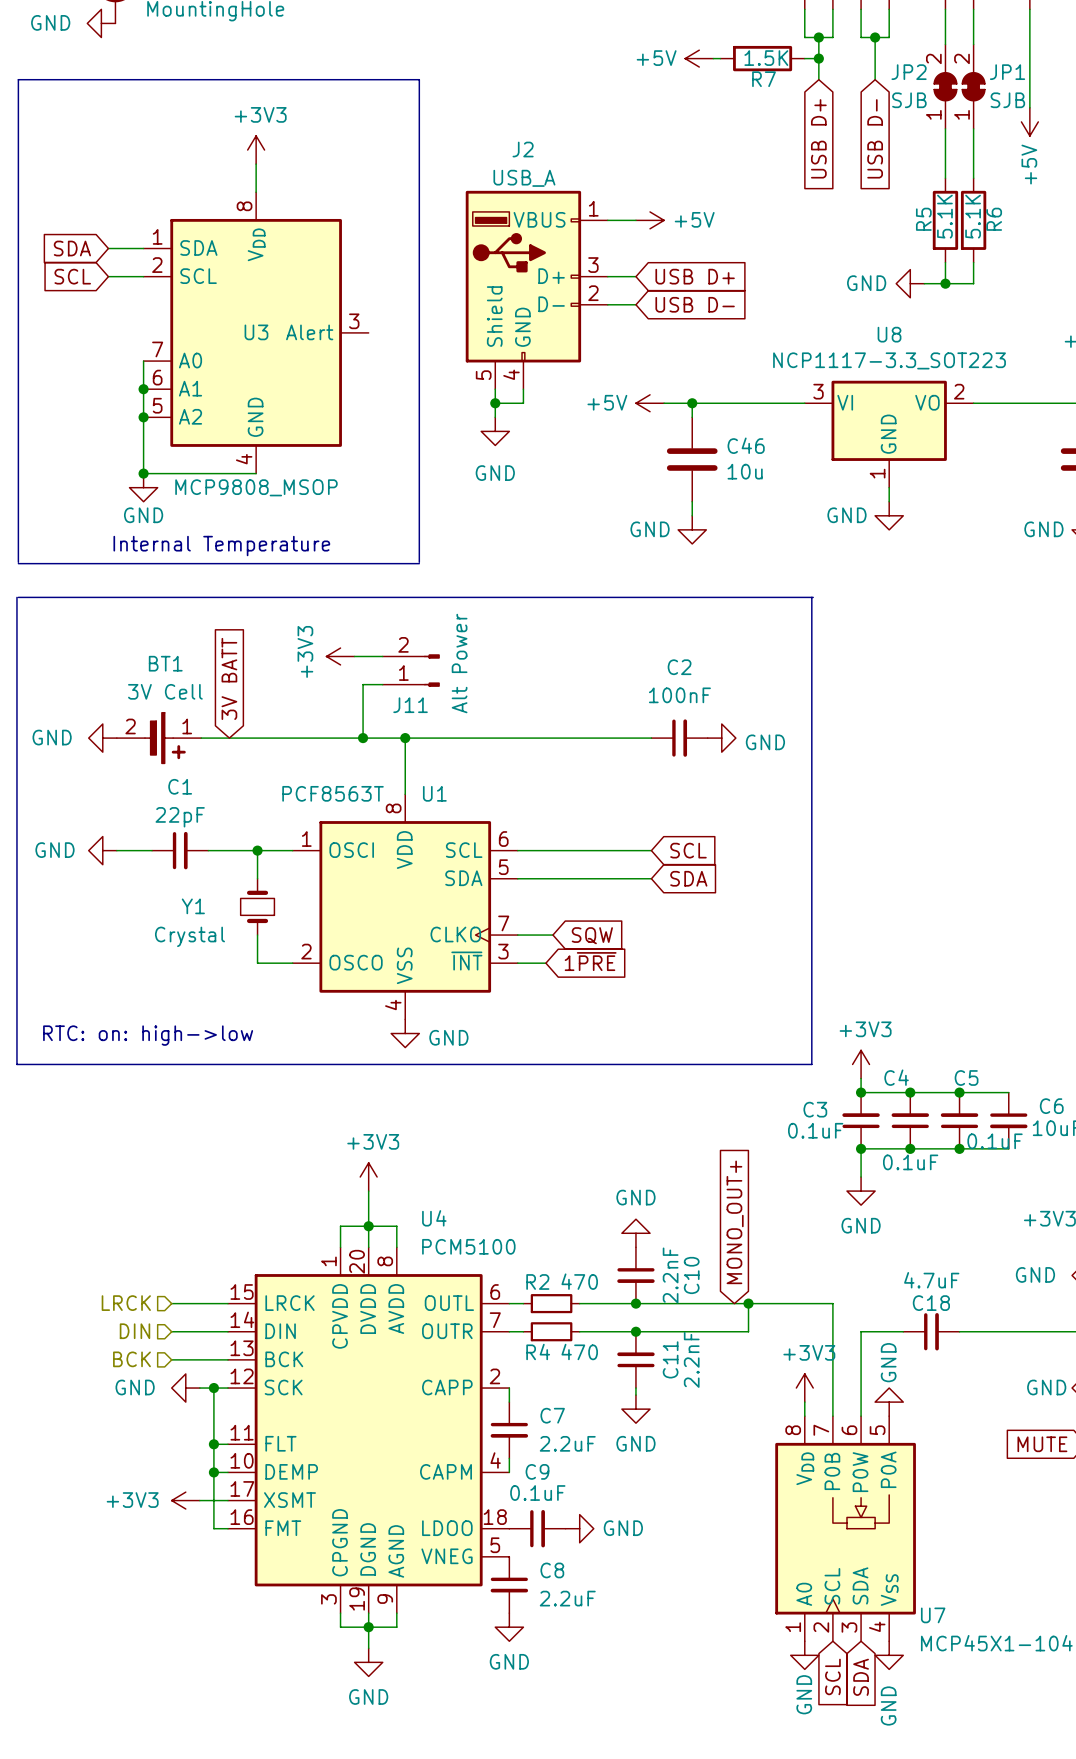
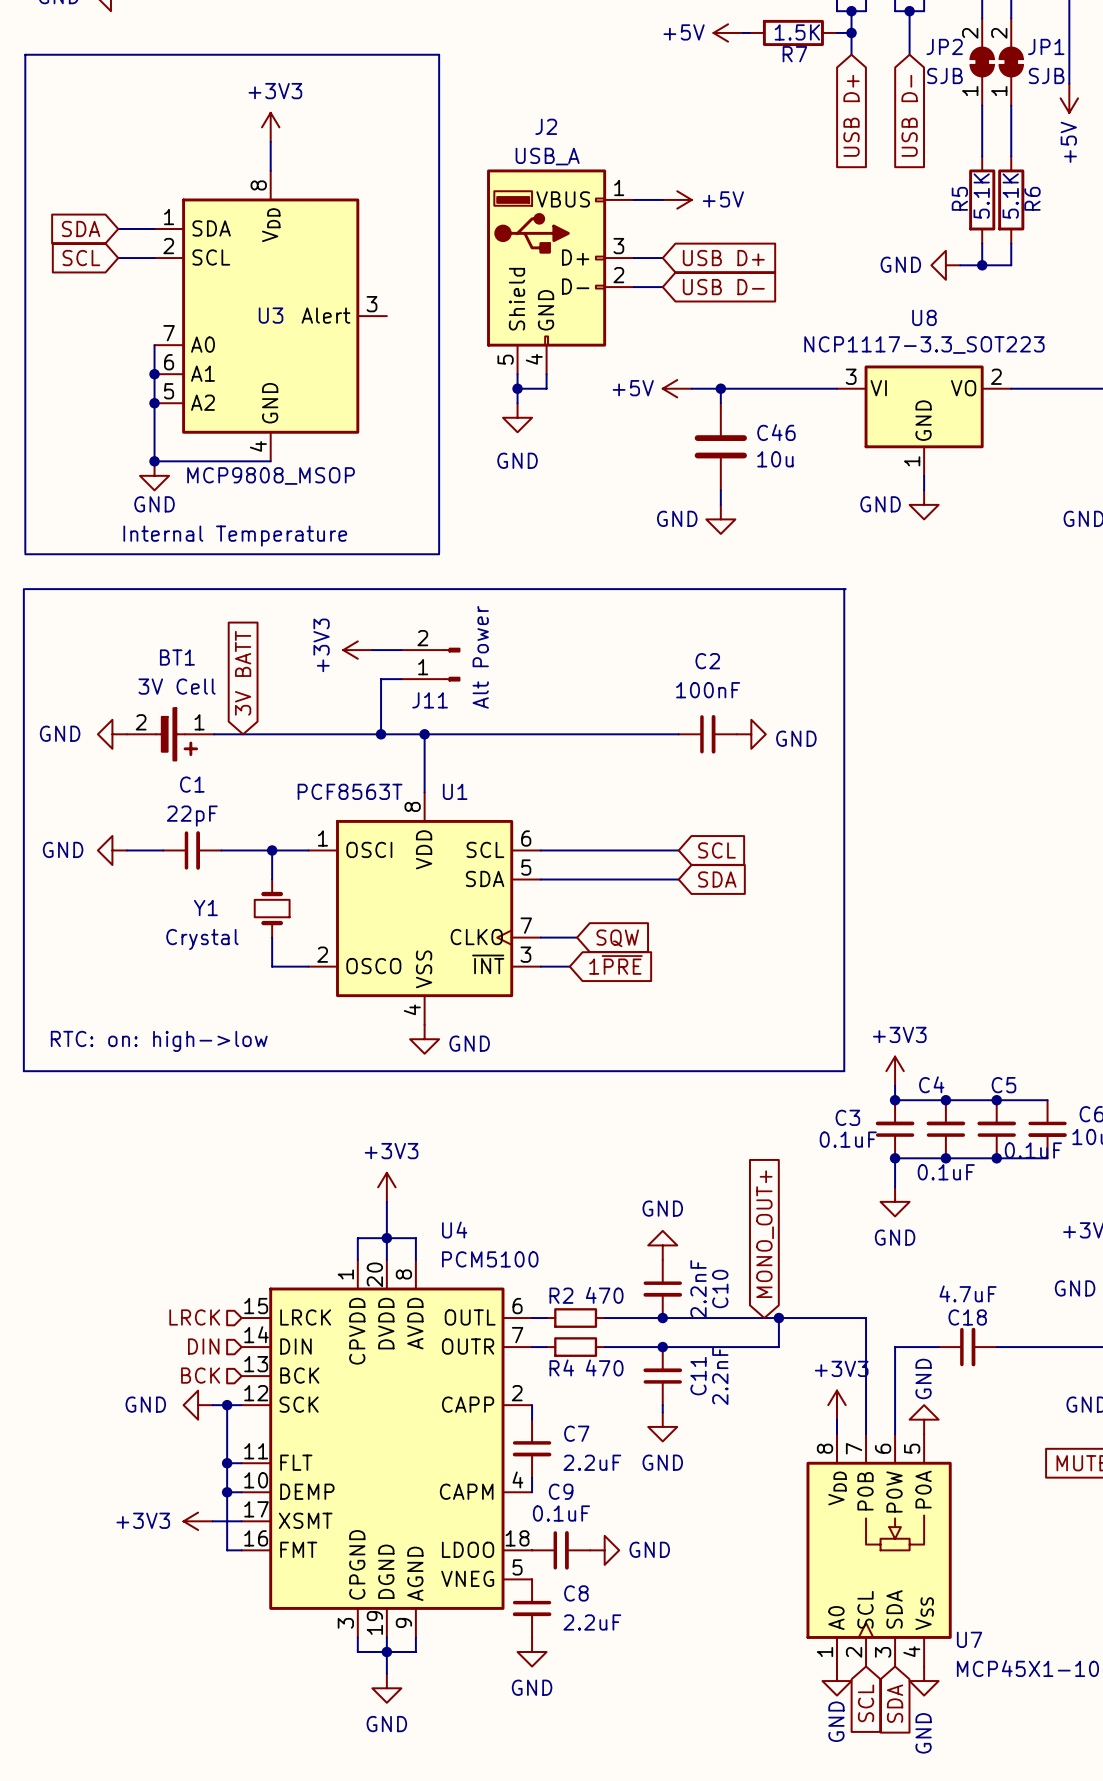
hierarchical label position: LRCK (126, 1303) -> LRCK (194, 1317)
wire: (171, 1303) (227, 1303) -> none
hierarchical label position: DIN (134, 1331) -> DIN (203, 1346)
wire: (171, 1331) (227, 1331) -> none
hierarchical label position: BCK (131, 1359) -> BCK (200, 1375)
wire: (171, 1359) (227, 1359) -> none

